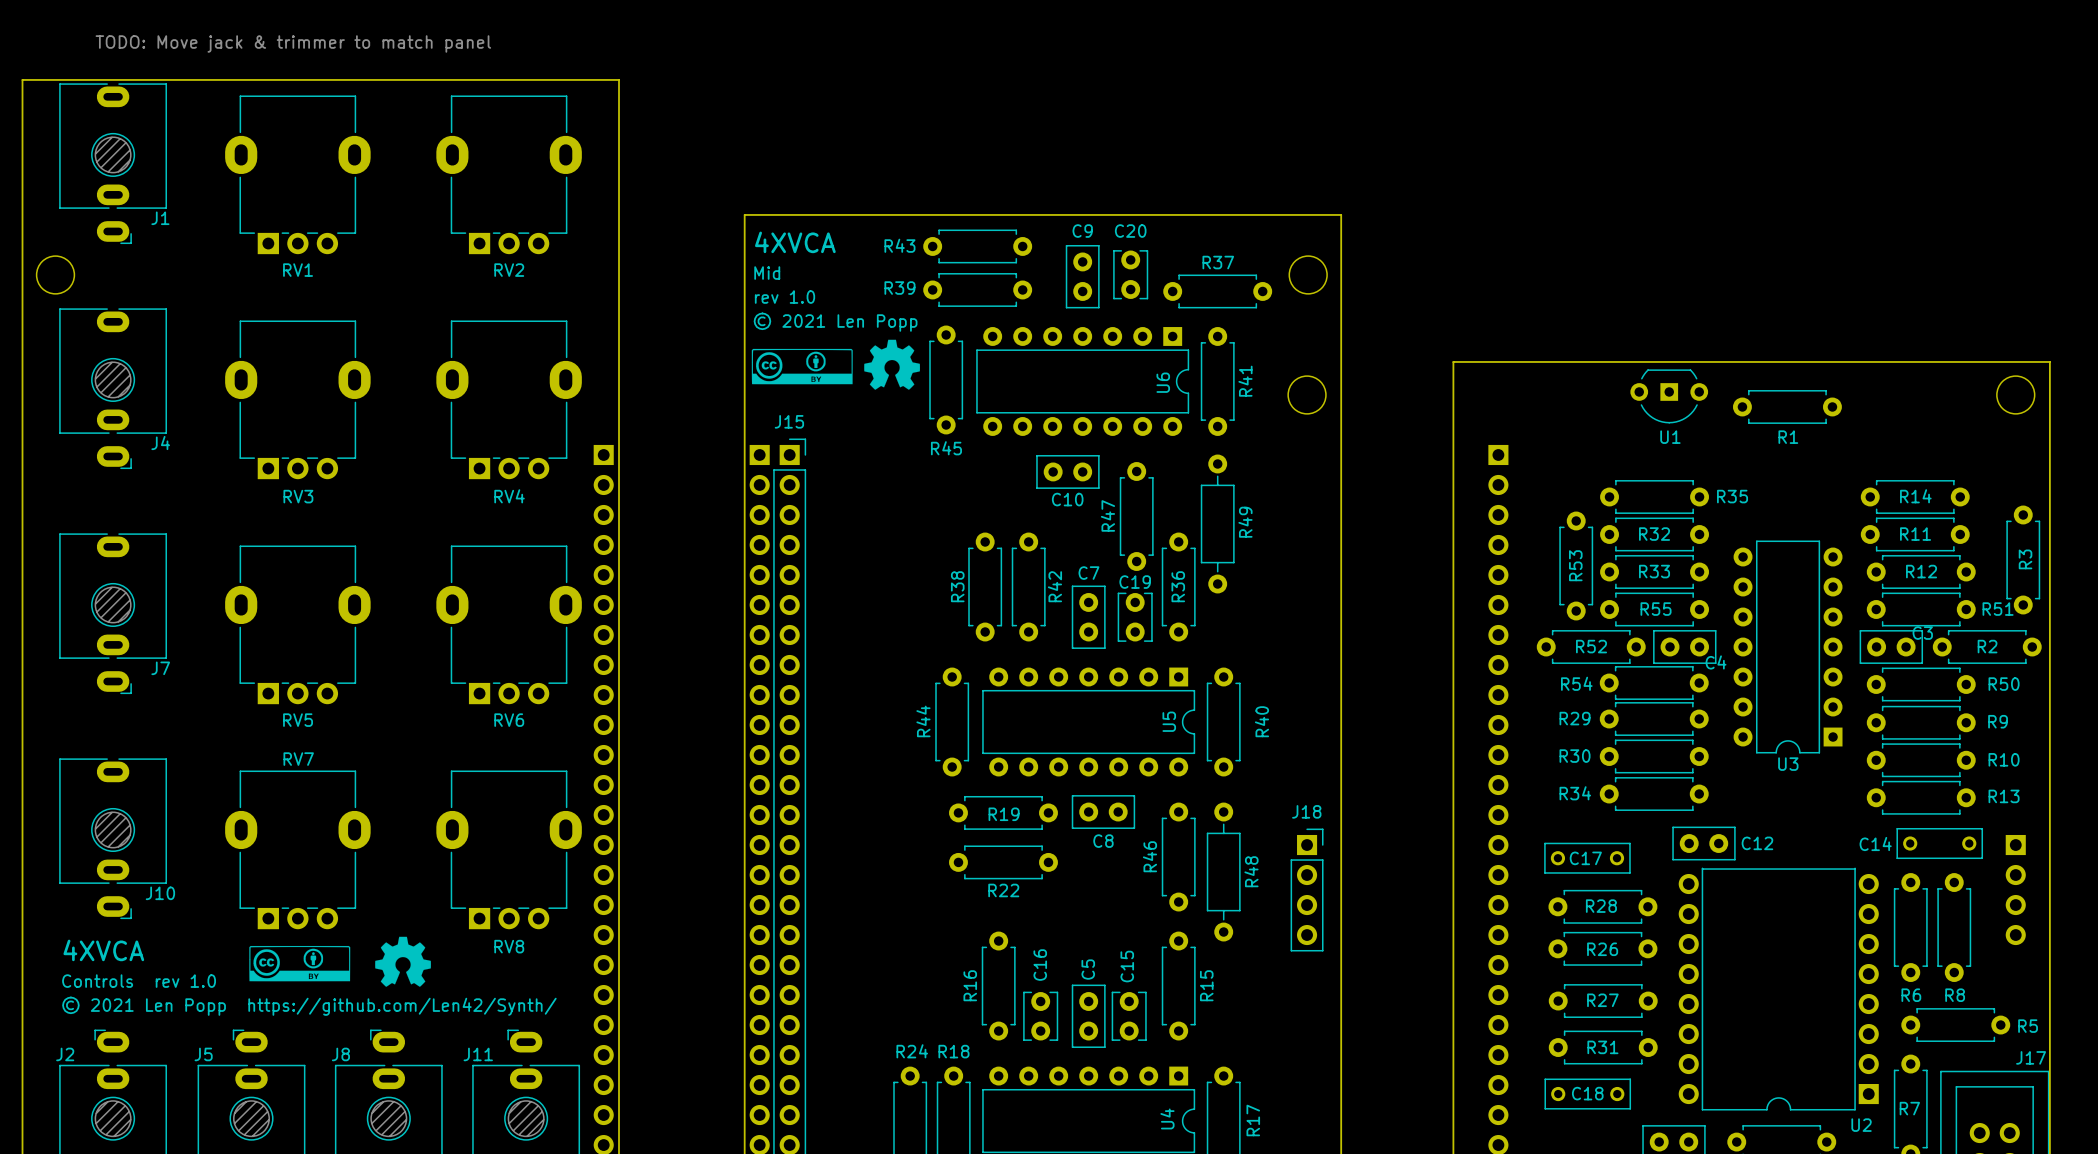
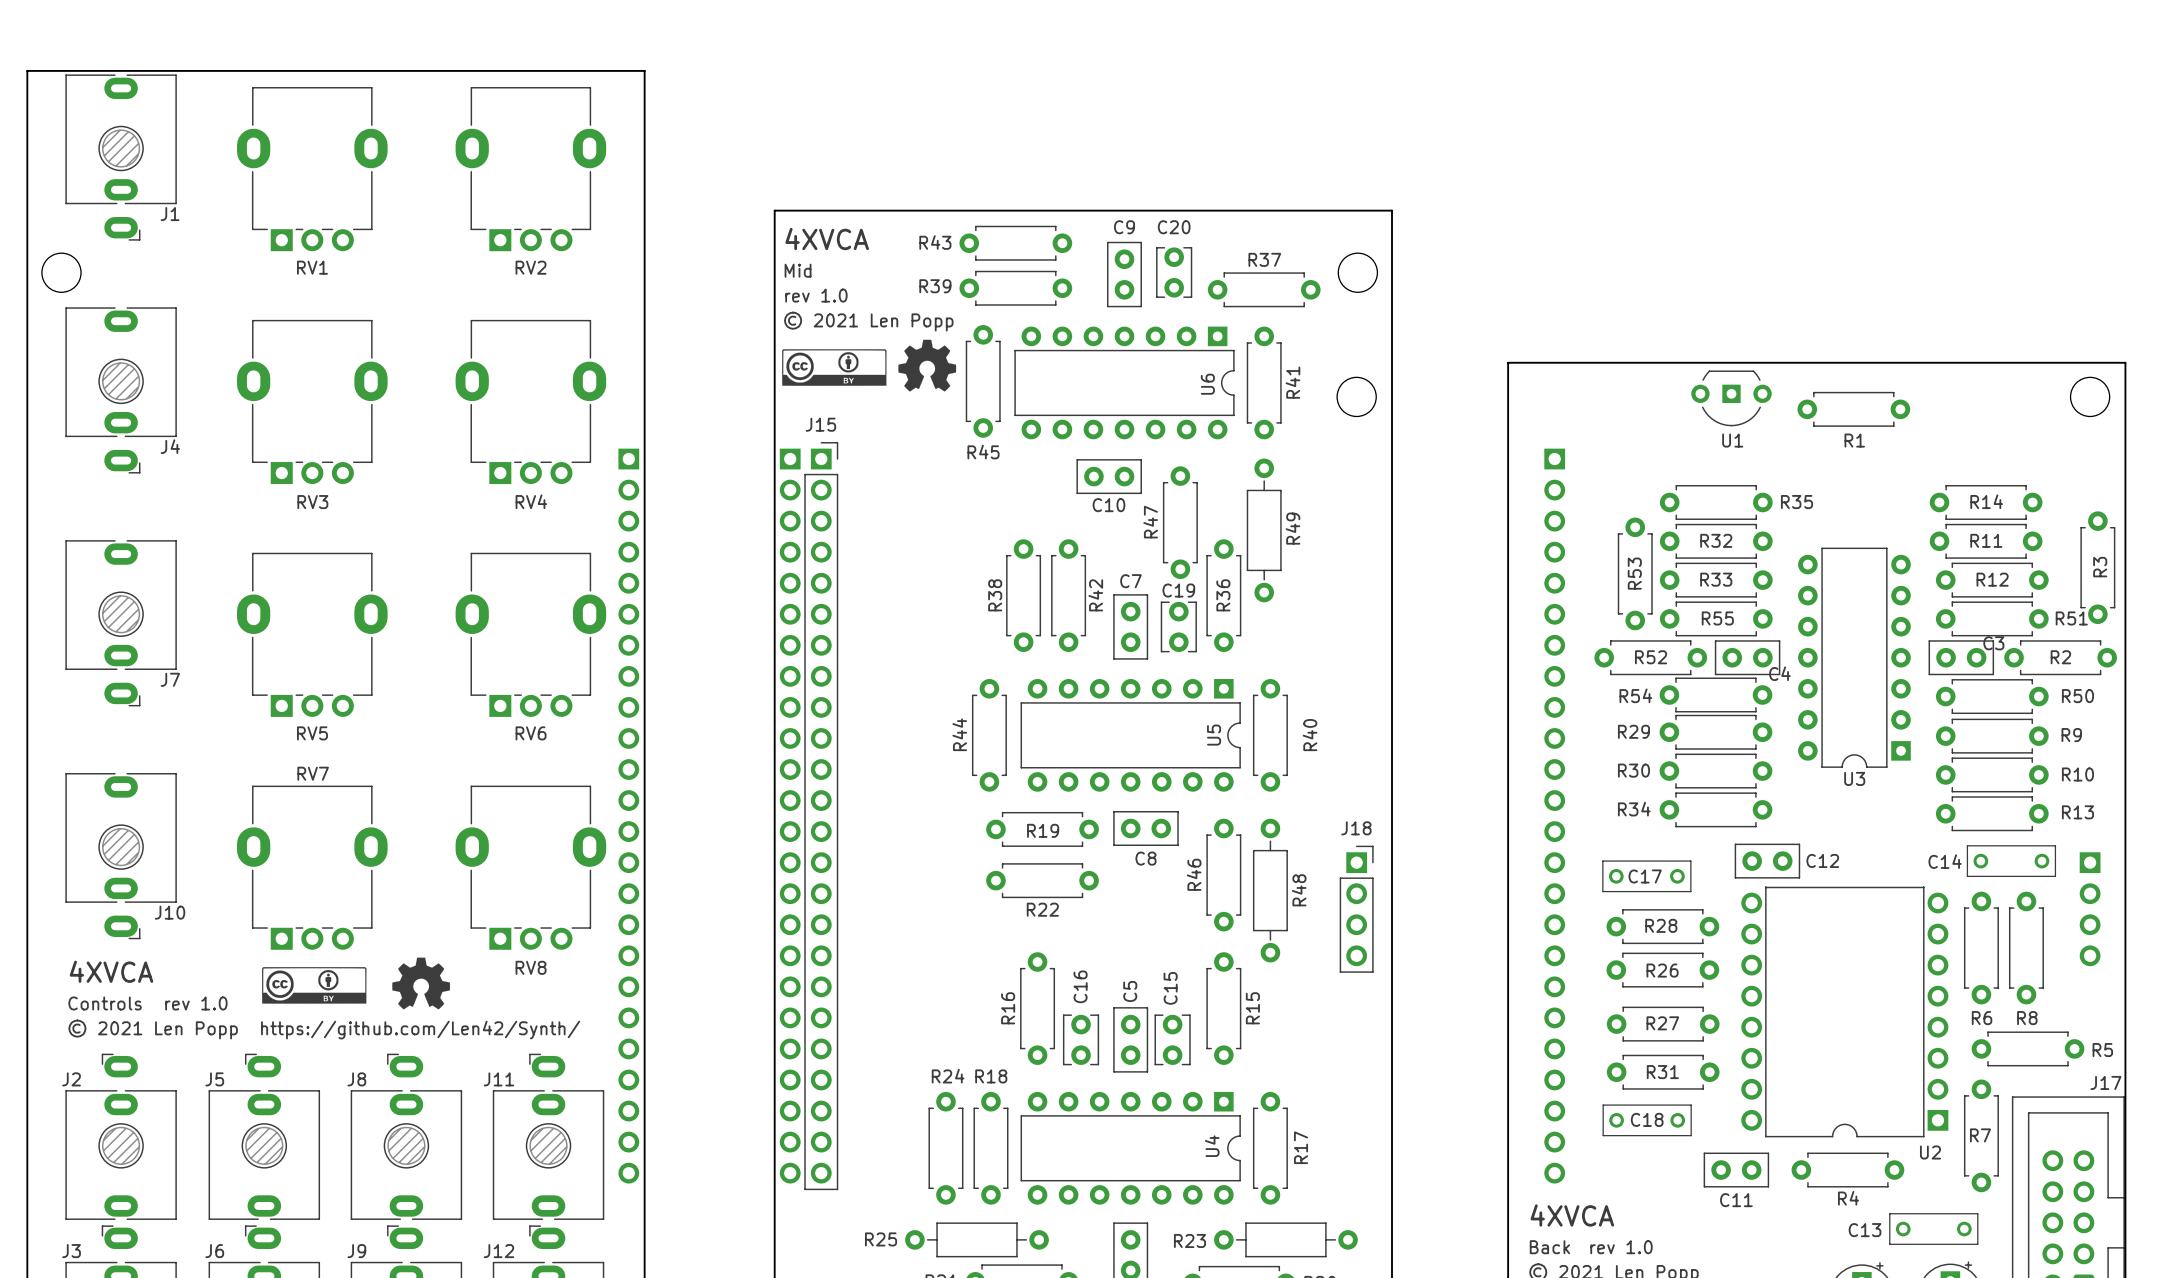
text: TODO: Move jack & trimmer to match panel (293, 43) -> none

